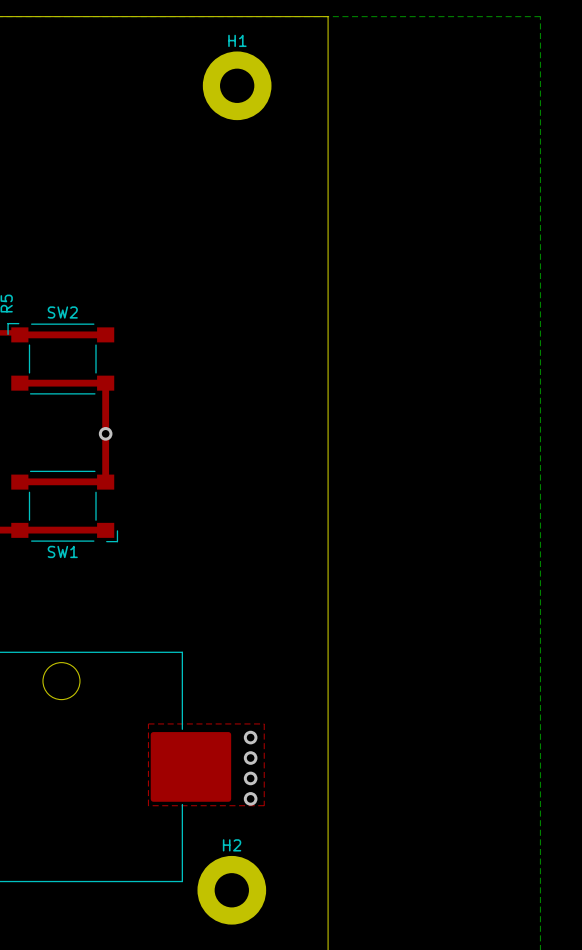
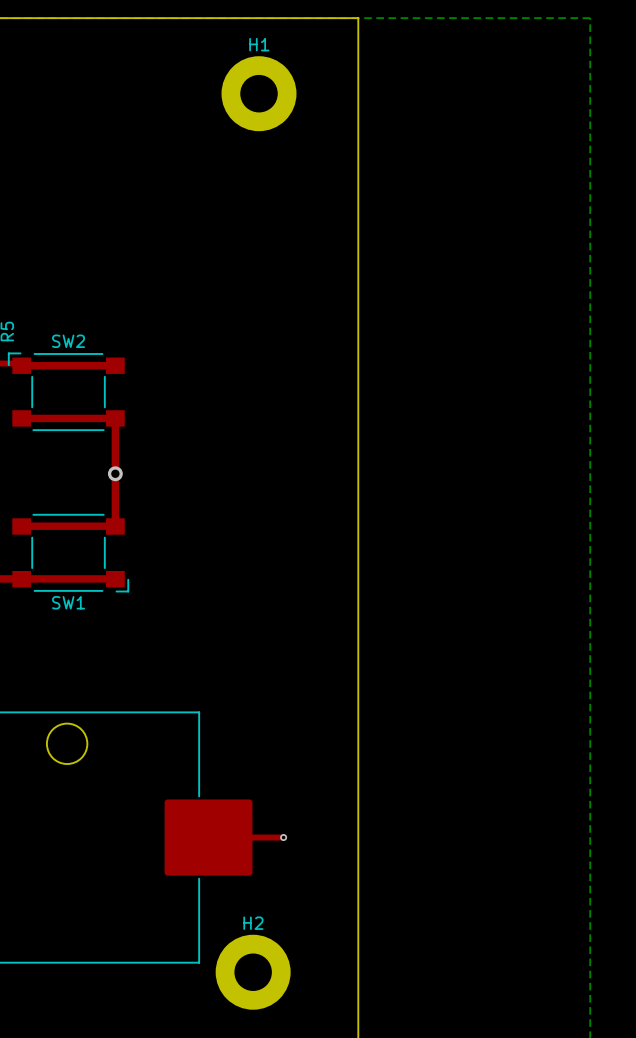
top zone outline: (148, 723) (264, 723) (264, 805) (148, 805) (148, 723) -> none
via: (250, 737) -> none
via: (250, 758) -> none
top track: none -> (216, 837) (282, 837)
via: none -> (283, 837)
via: (250, 778) -> none
via: (250, 798) -> none

